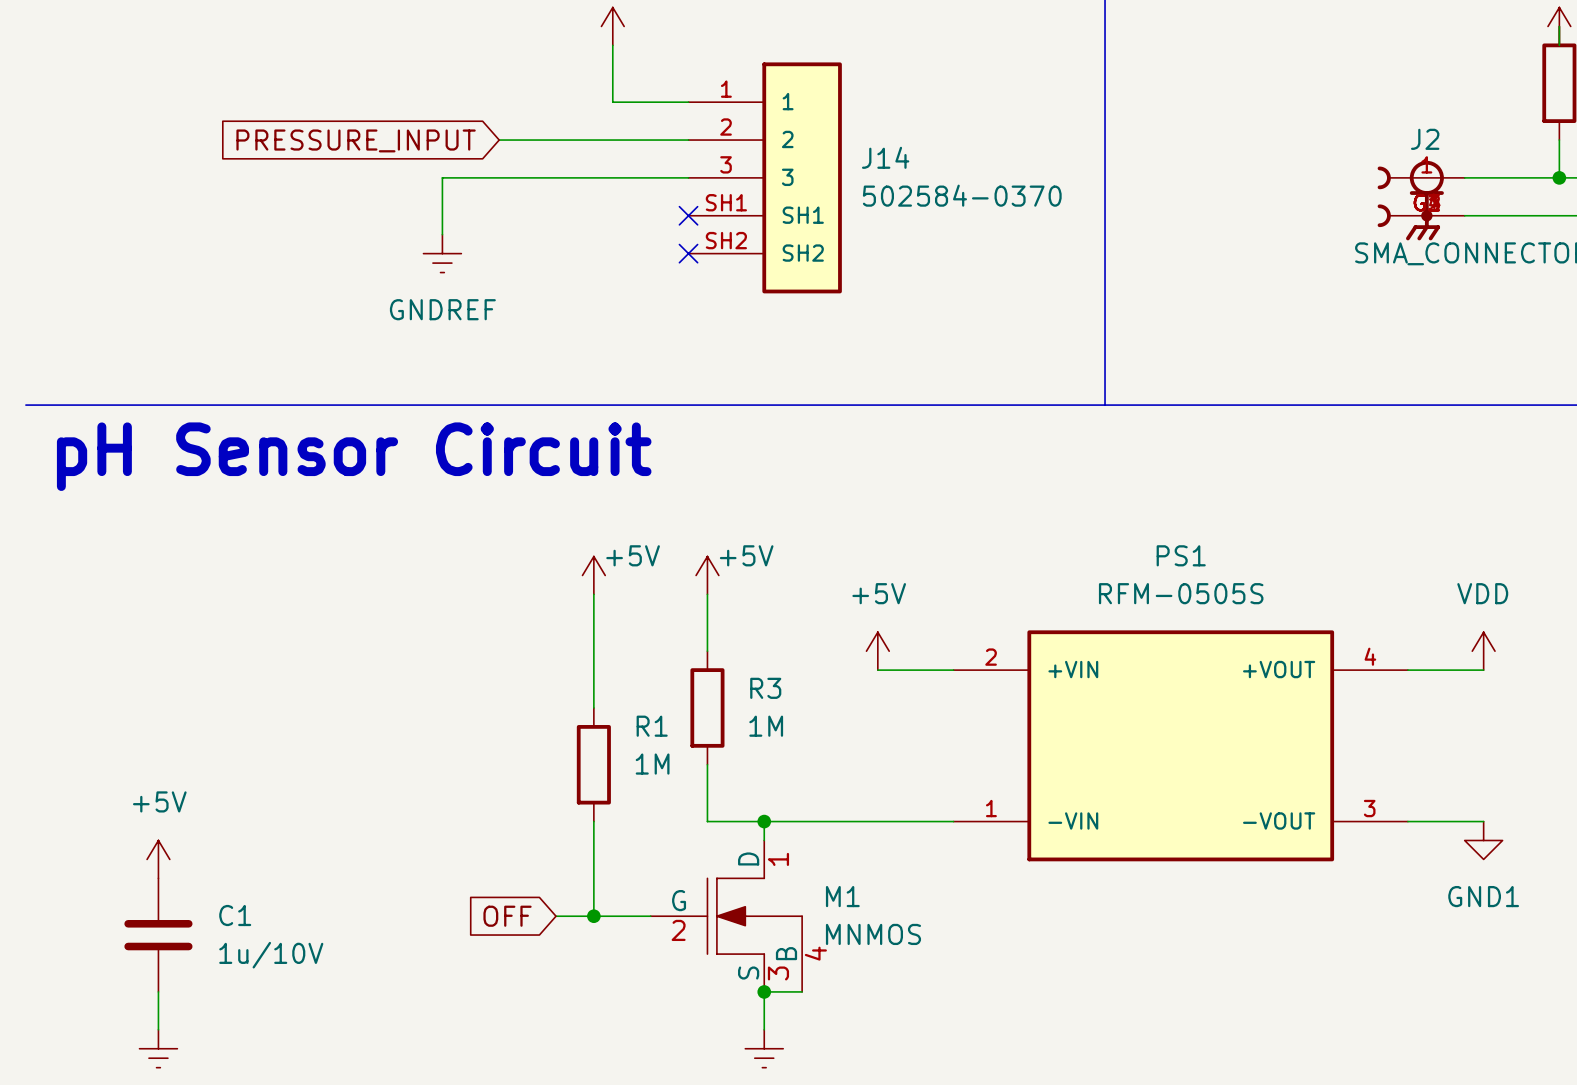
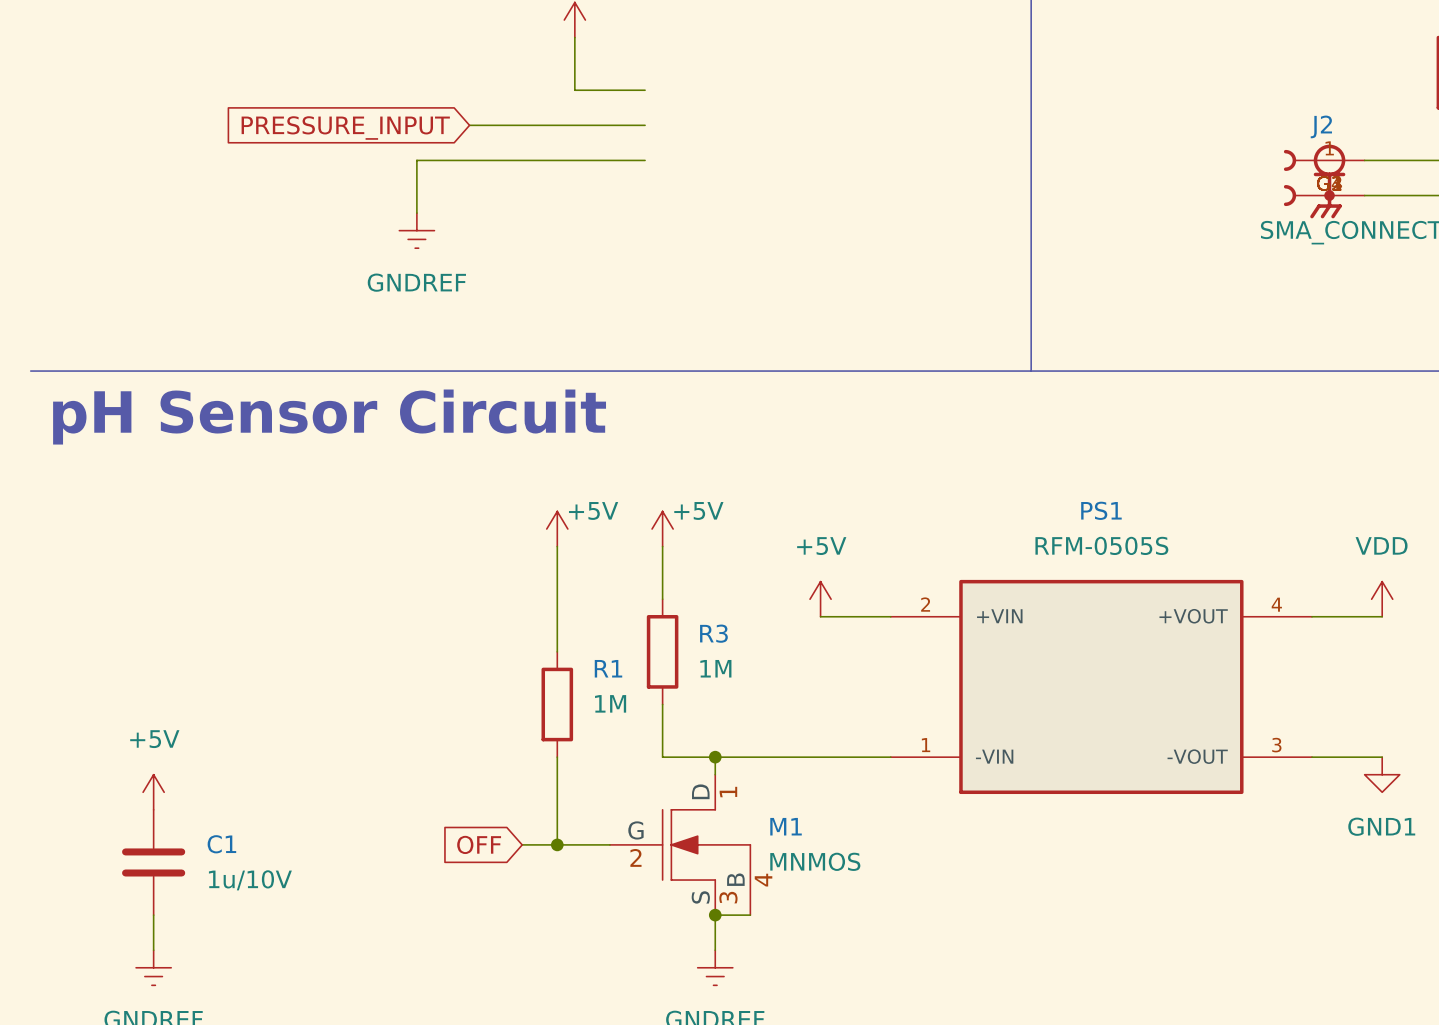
J14: 502584-0370 (765, 177) -> none
no-connect mark: (688, 215) -> none
no-connect mark: (688, 253) -> none

